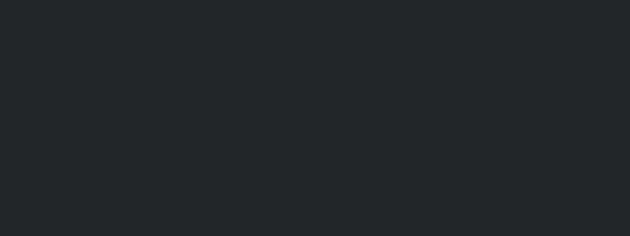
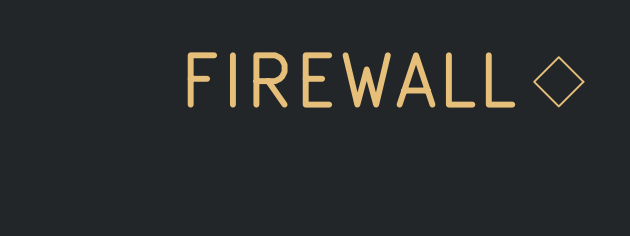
hierarchical label: none -> FIREWALL (351, 79)

